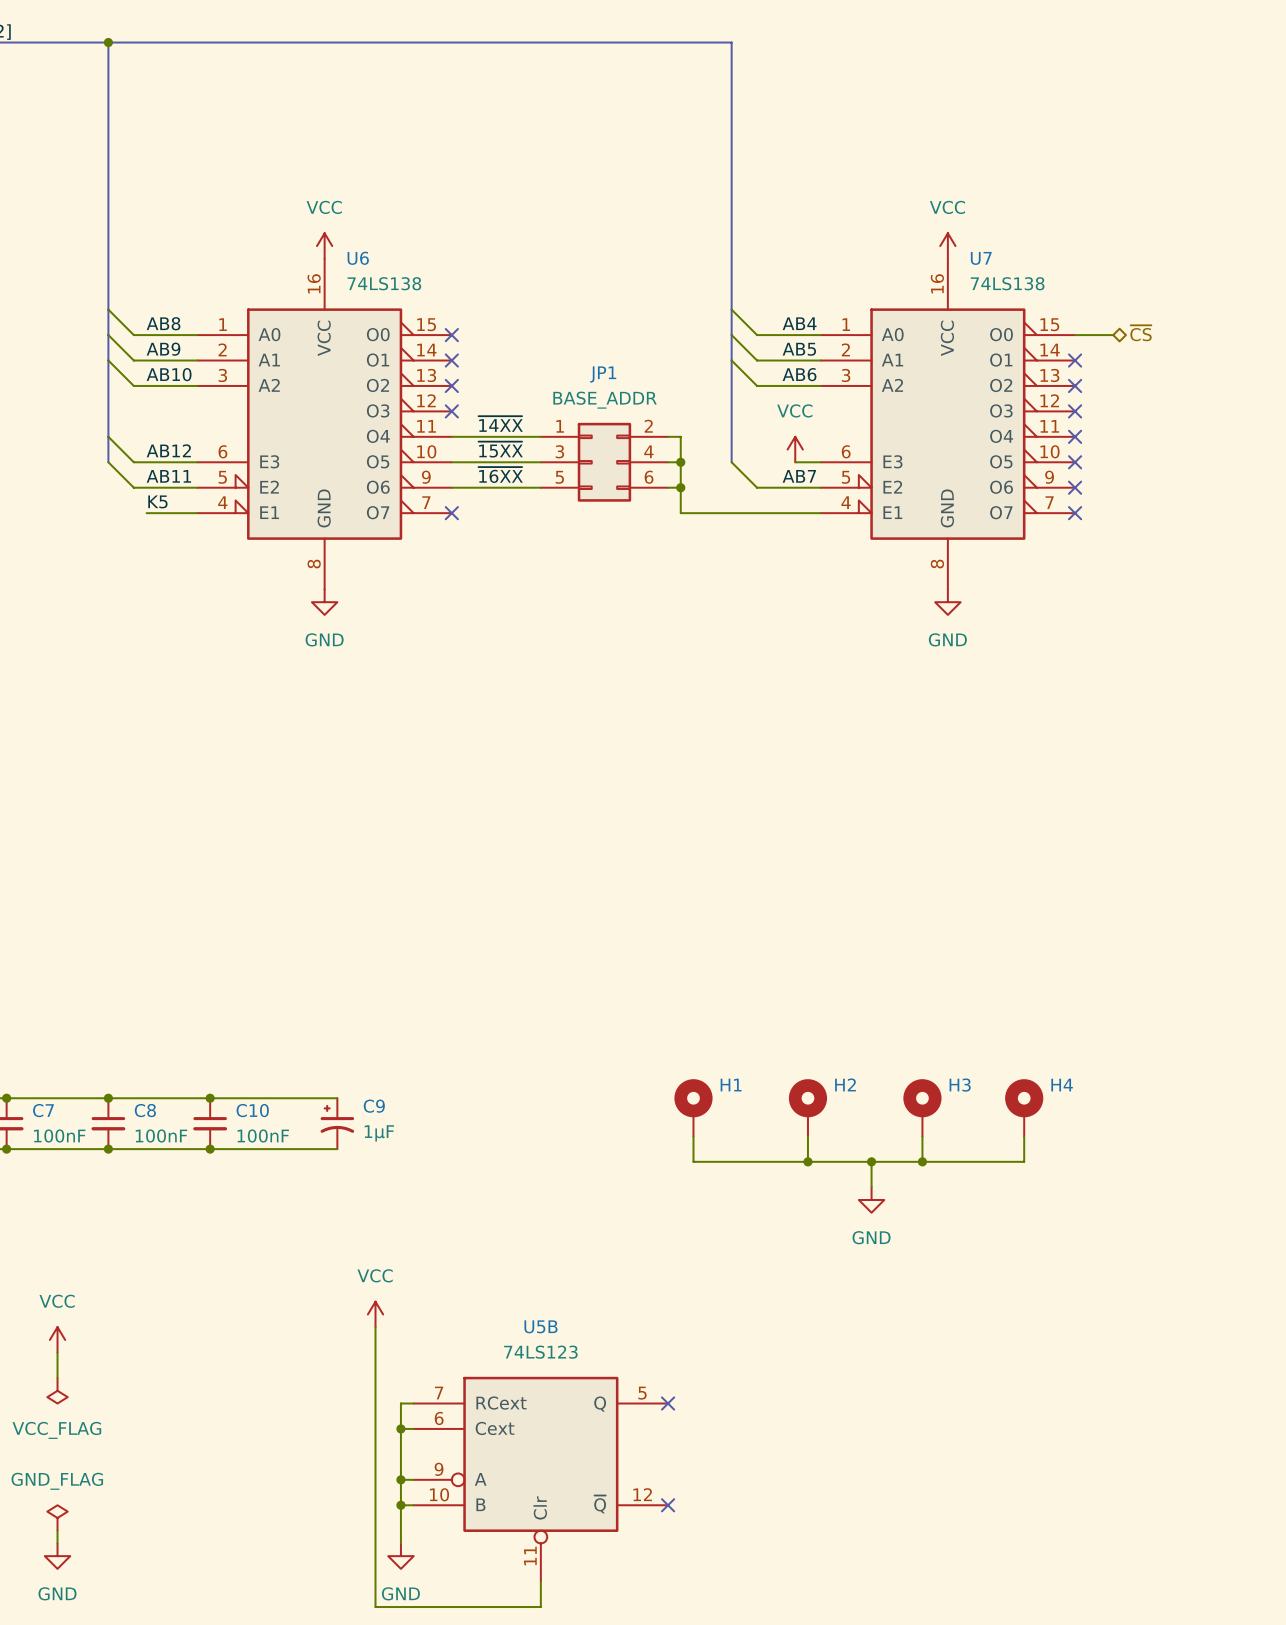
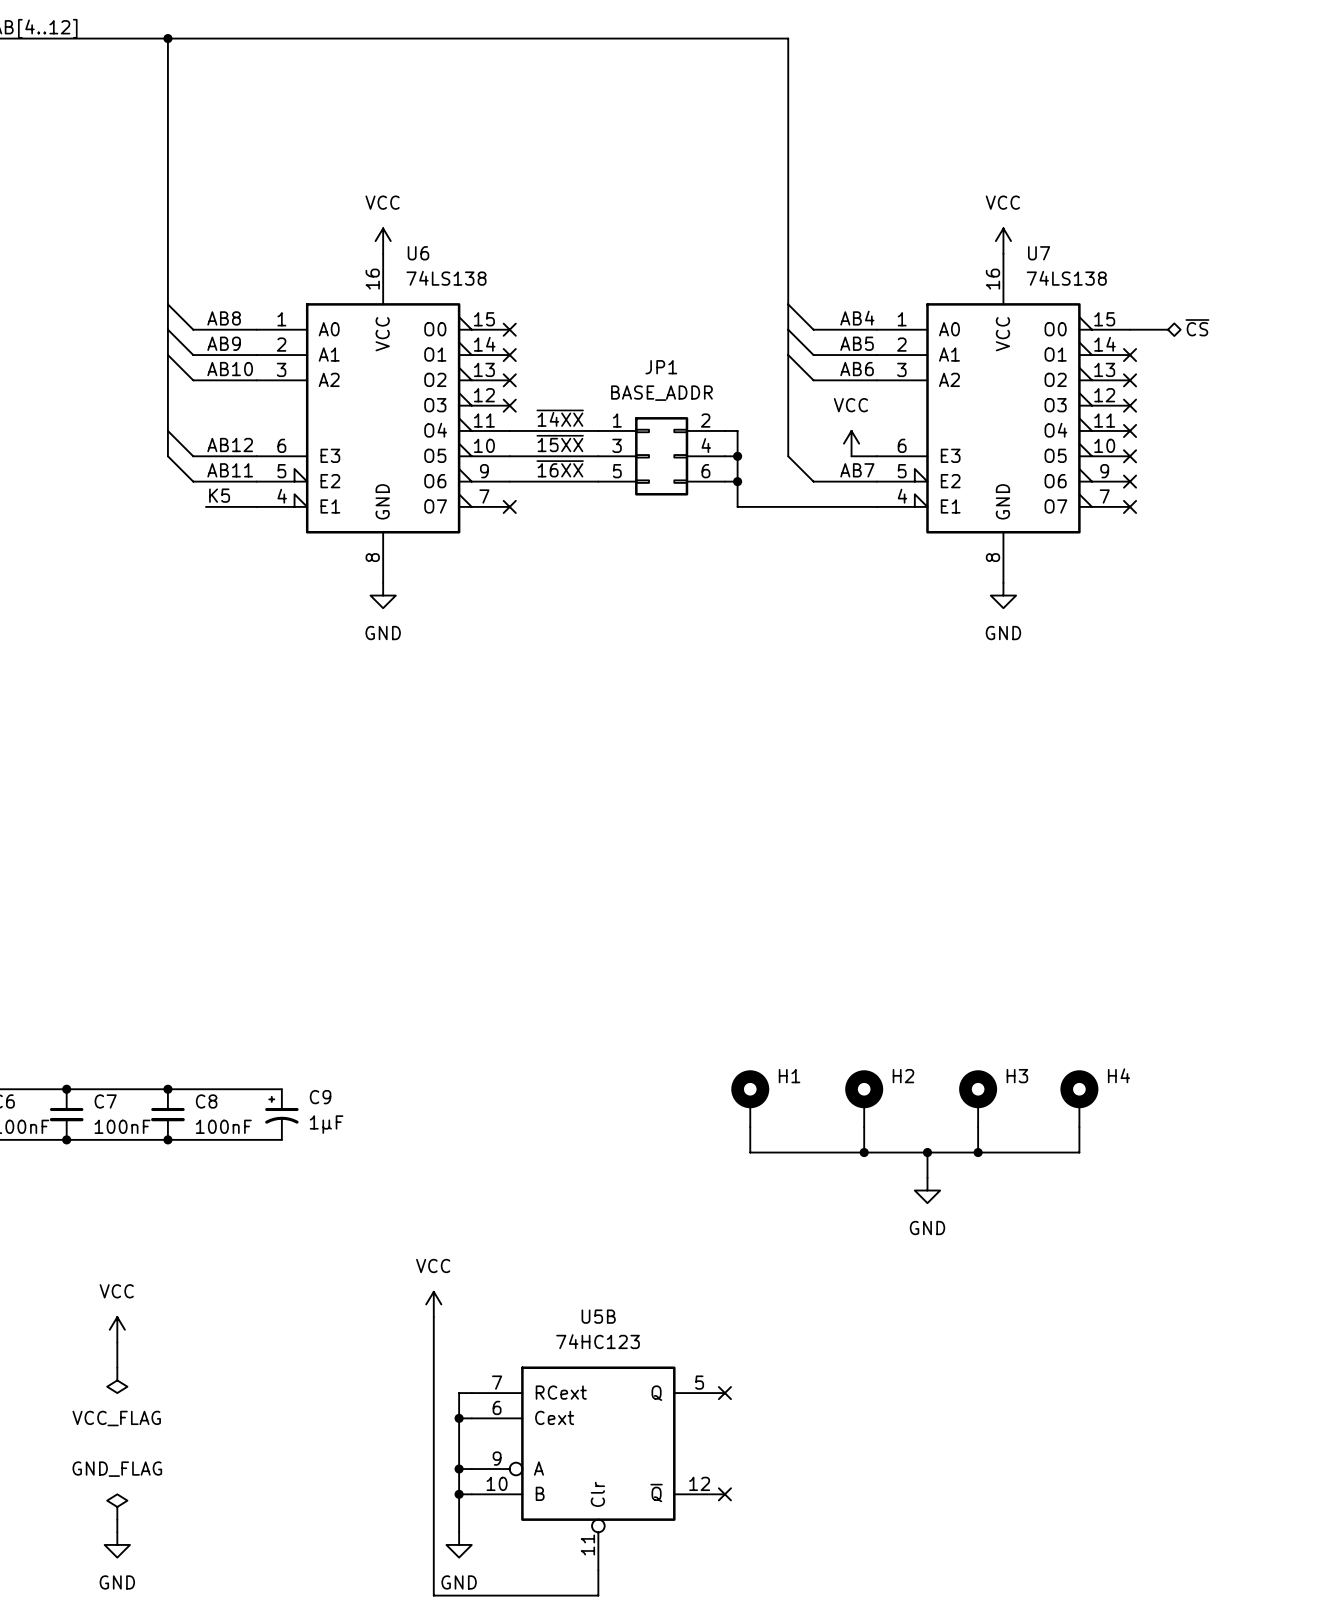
junction: (210, 1098) -> none
wire: (222, 1098) (337, 1098) -> none
C10: 100nF (210, 1123) -> none
C9 position: (337, 1123) -> (281, 1114)
junction: (210, 1149) -> none
wire: (222, 1149) (337, 1149) -> none
U5B value: 74LS123 (540, 1352) -> 74HC123 (598, 1341)

